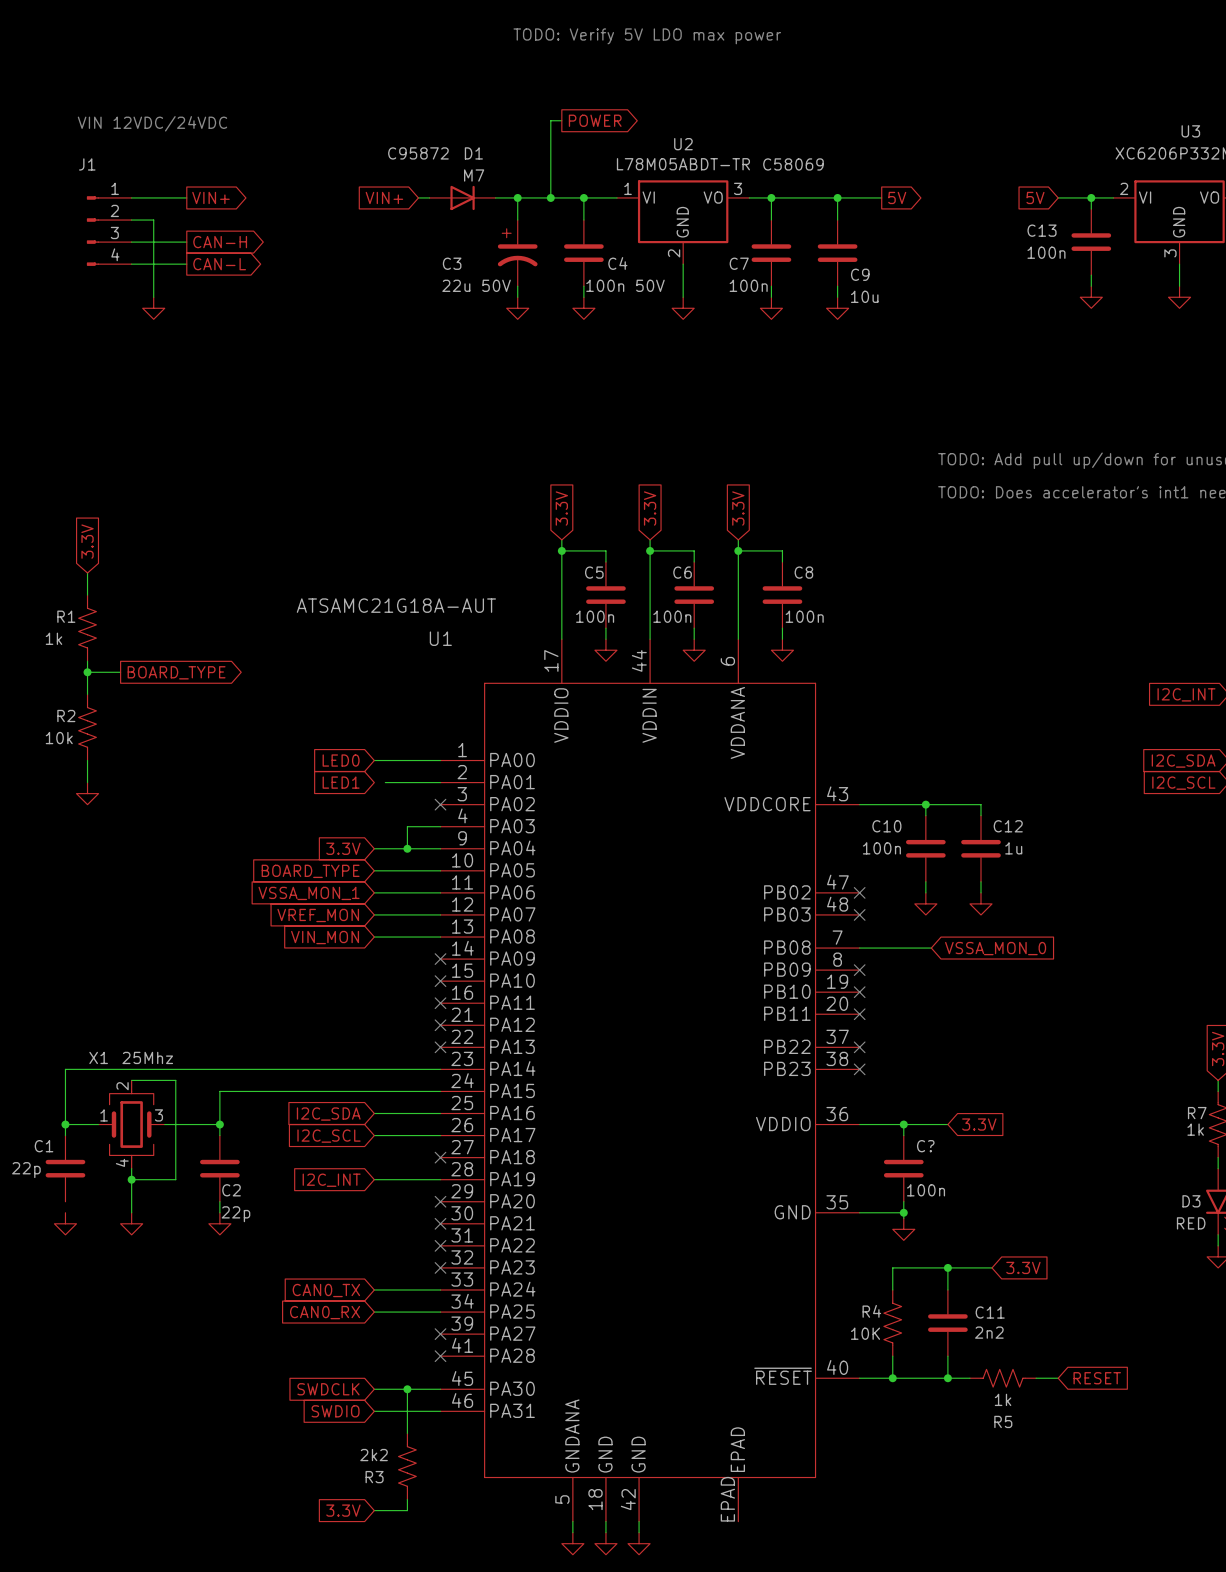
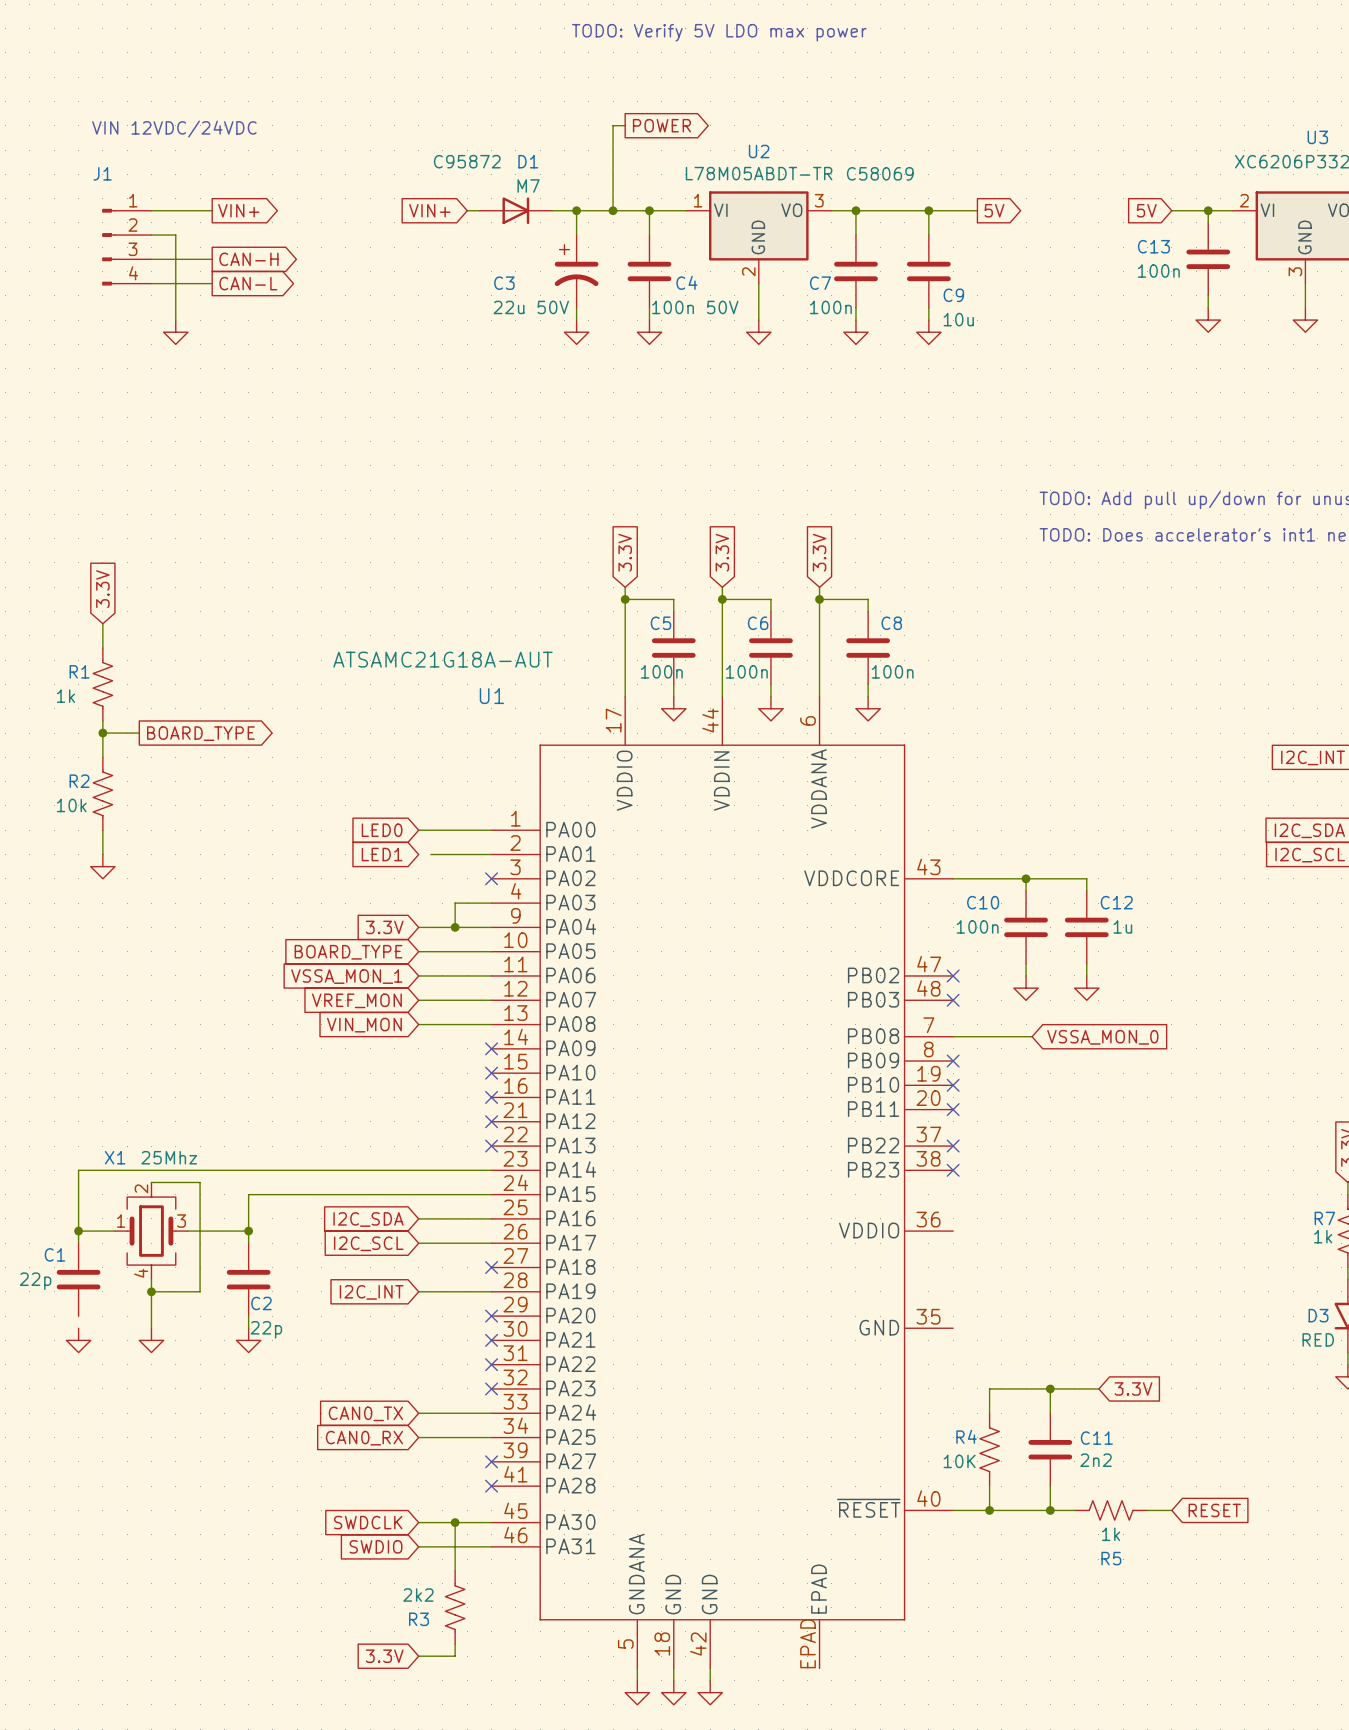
wire: (859, 1124) (947, 1124) -> none
wire: (903, 1124) (903, 1135) -> none
junction: (903, 1124) -> none
global label: 3.3V (979, 1124) -> none
C?: 100n (903, 1168) -> none
wire: (903, 1201) (903, 1218) -> none
wire: (859, 1212) (903, 1212) -> none
junction: (903, 1212) -> none
power symbol: (903, 1229) -> none

